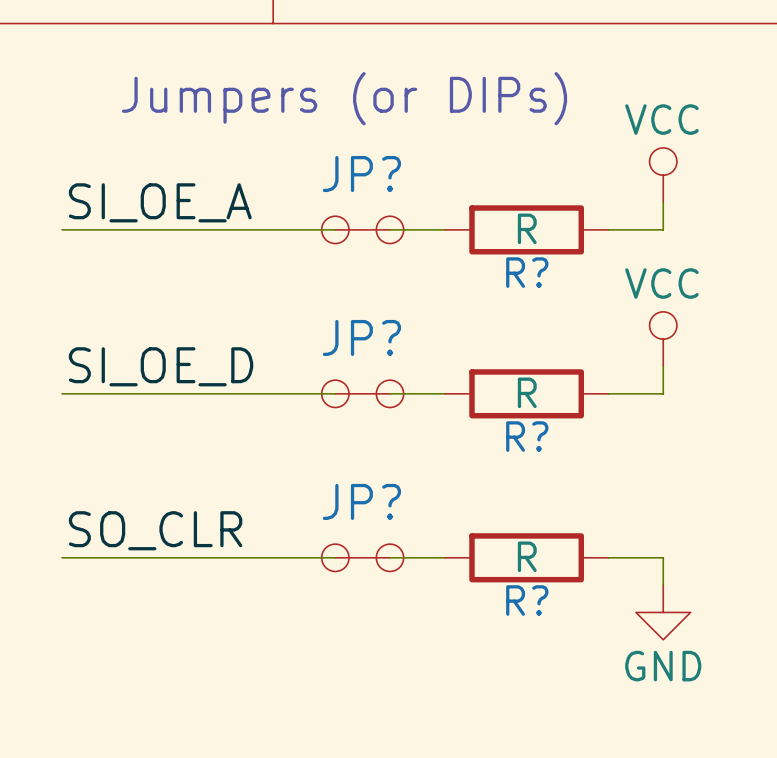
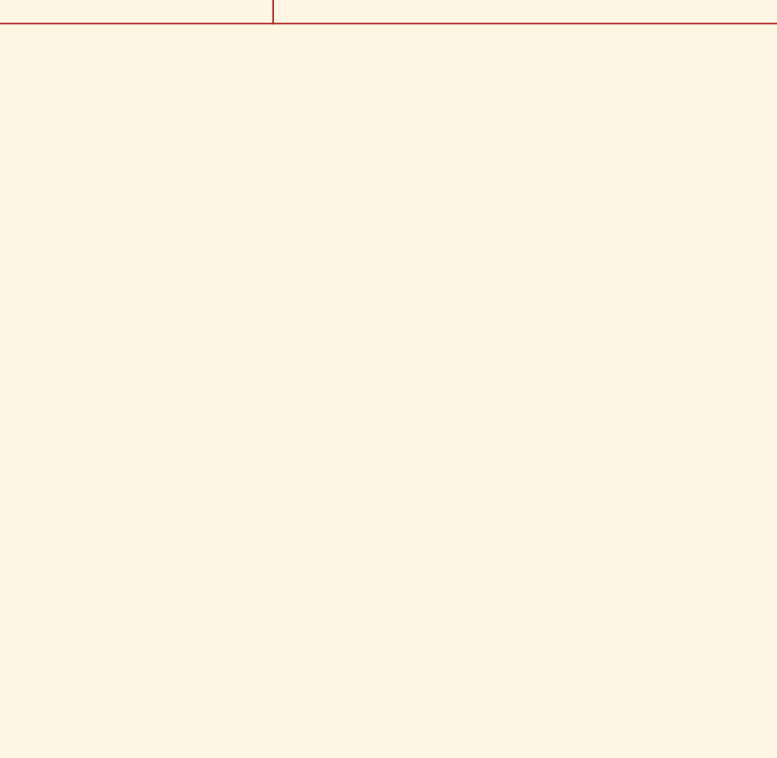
text: Jumpers (or DIPs) (344, 98) -> none
power symbol: VCC (663, 175) -> none
label: SI_OE_A (160, 202) -> none
wire: (663, 202) (663, 229) (608, 229) -> none
wire: (62, 229) (335, 229) -> none
JP?: (362, 229) -> none
wire: (389, 229) (444, 229) -> none
R?: R (526, 229) -> none
power symbol: VCC (663, 339) -> none
label: SI_OE_D (161, 366) -> none
wire: (663, 366) (663, 393) (608, 393) -> none
wire: (62, 393) (335, 393) -> none
JP?: (362, 393) -> none
wire: (389, 393) (444, 393) -> none
R?: R (526, 393) -> none
label: SO_CLR (155, 530) -> none
wire: (62, 557) (335, 557) -> none
JP?: (362, 557) -> none
wire: (389, 557) (444, 557) -> none
R?: R (526, 557) -> none
wire: (608, 557) (663, 557) (663, 585) -> none
power symbol: GND (663, 612) -> none

